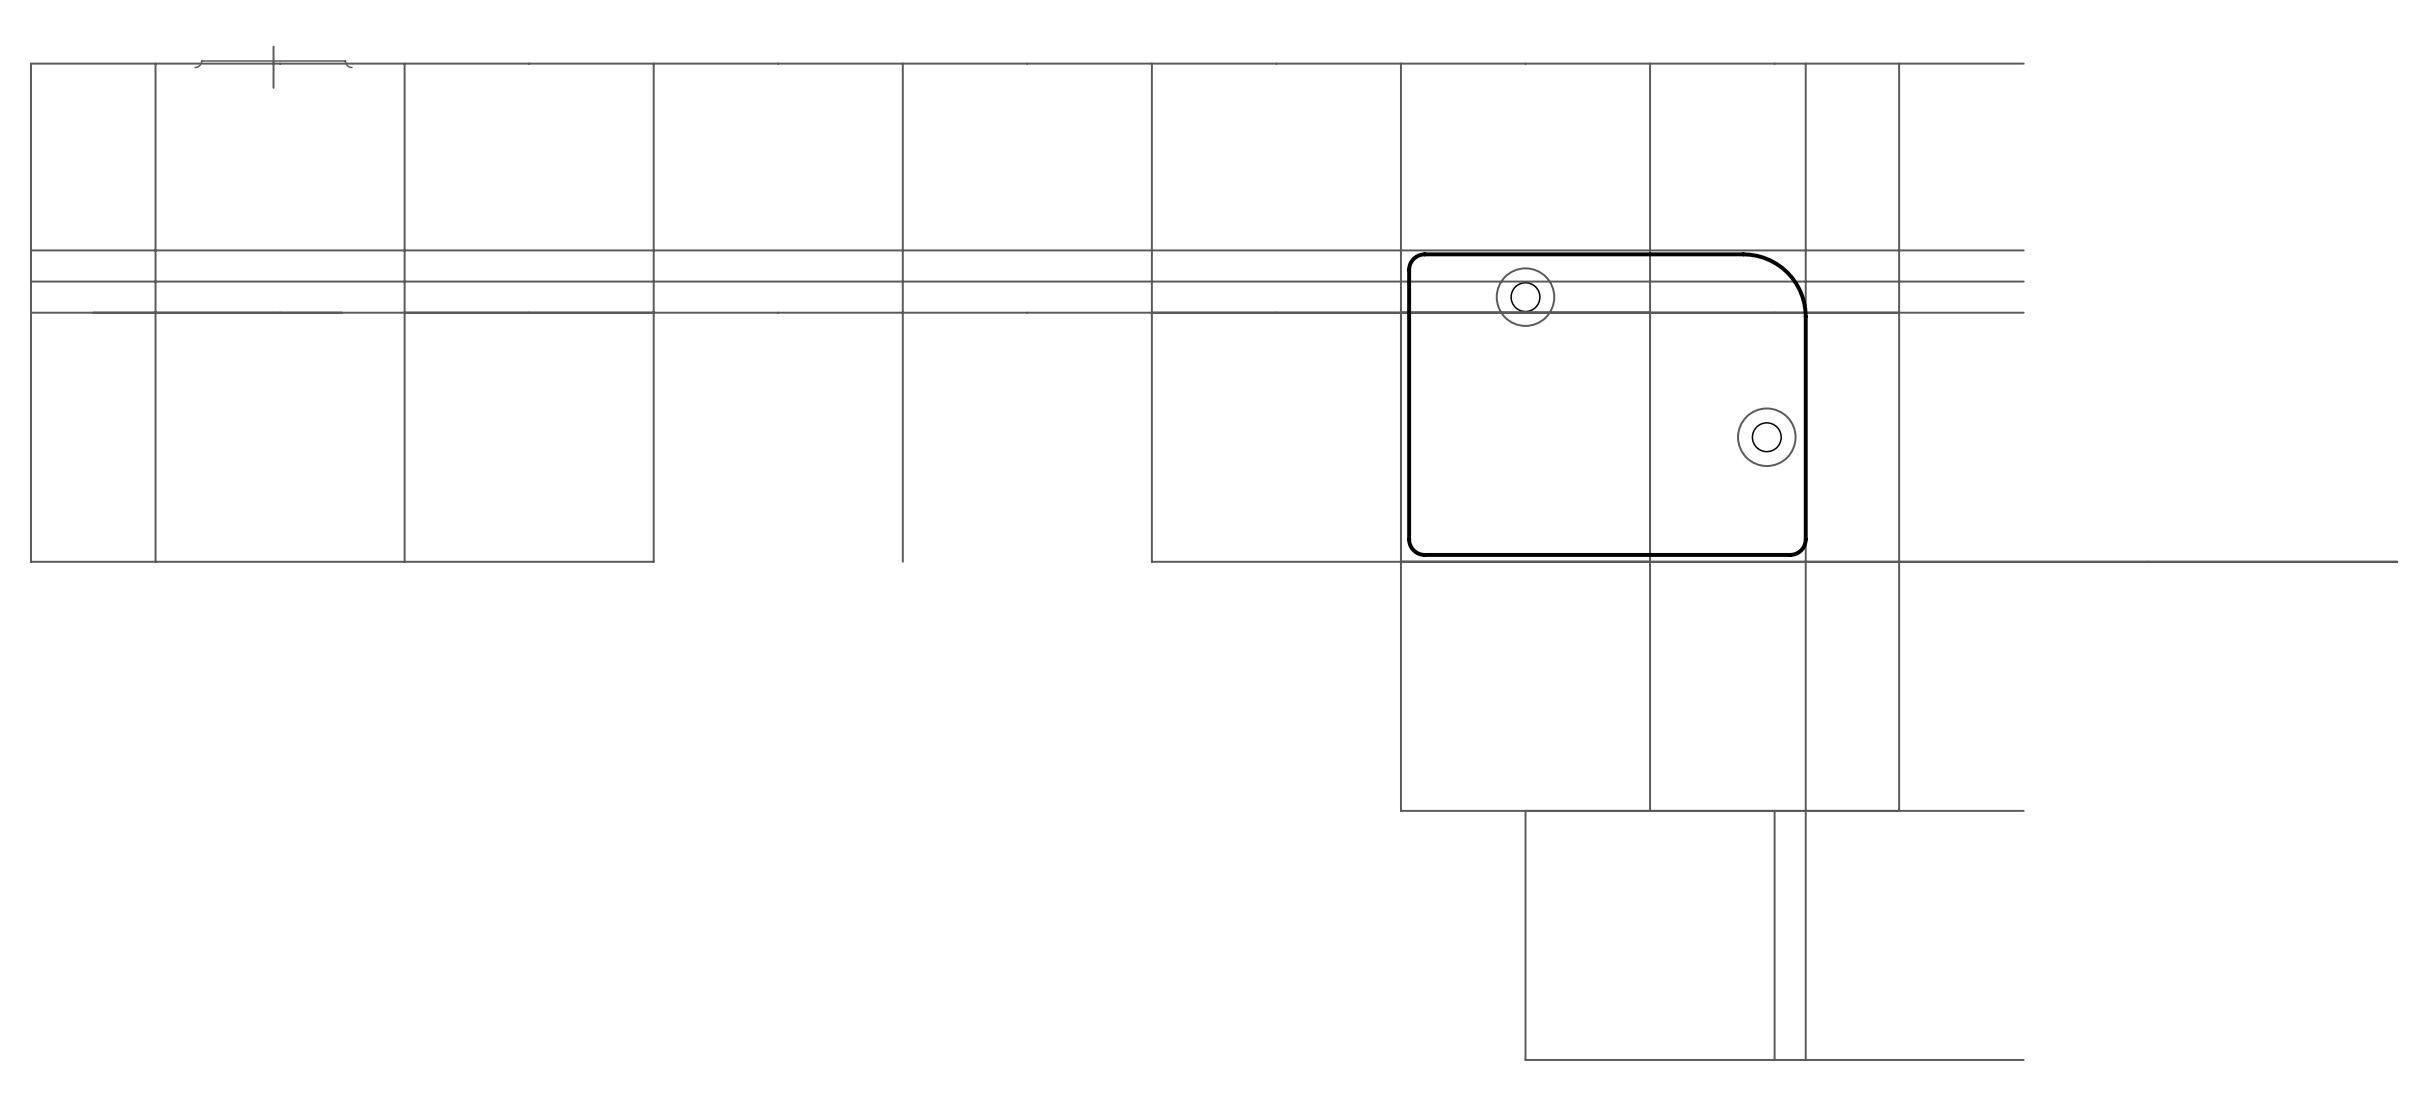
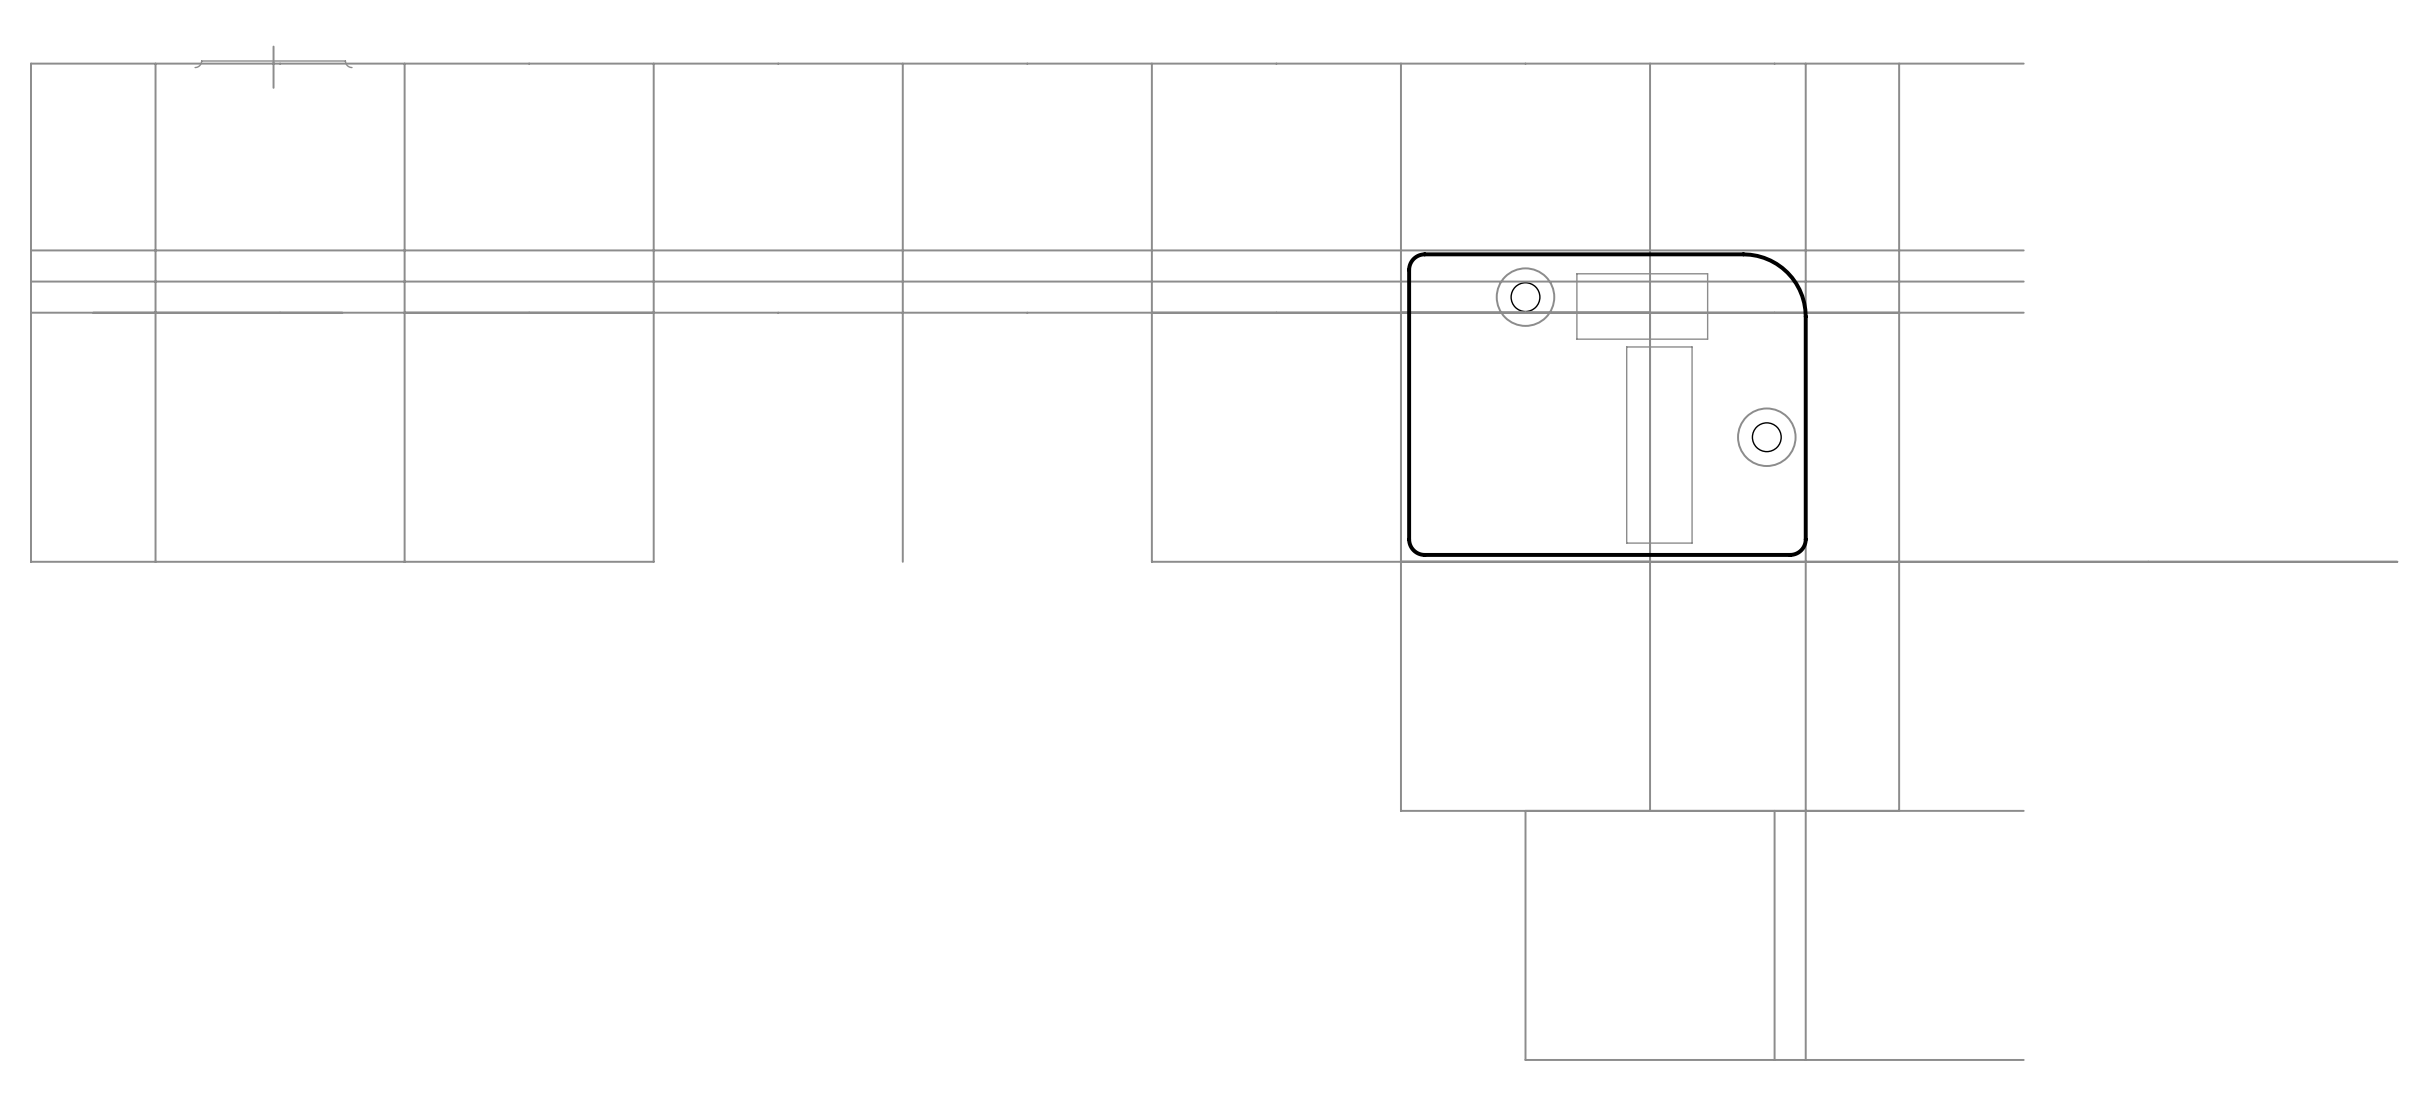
line: none -> (1576, 273) (1707, 273) (1707, 339) (1576, 339) (1576, 273)
line: none -> (1626, 346) (1692, 346) (1692, 543) (1626, 543) (1626, 346)

